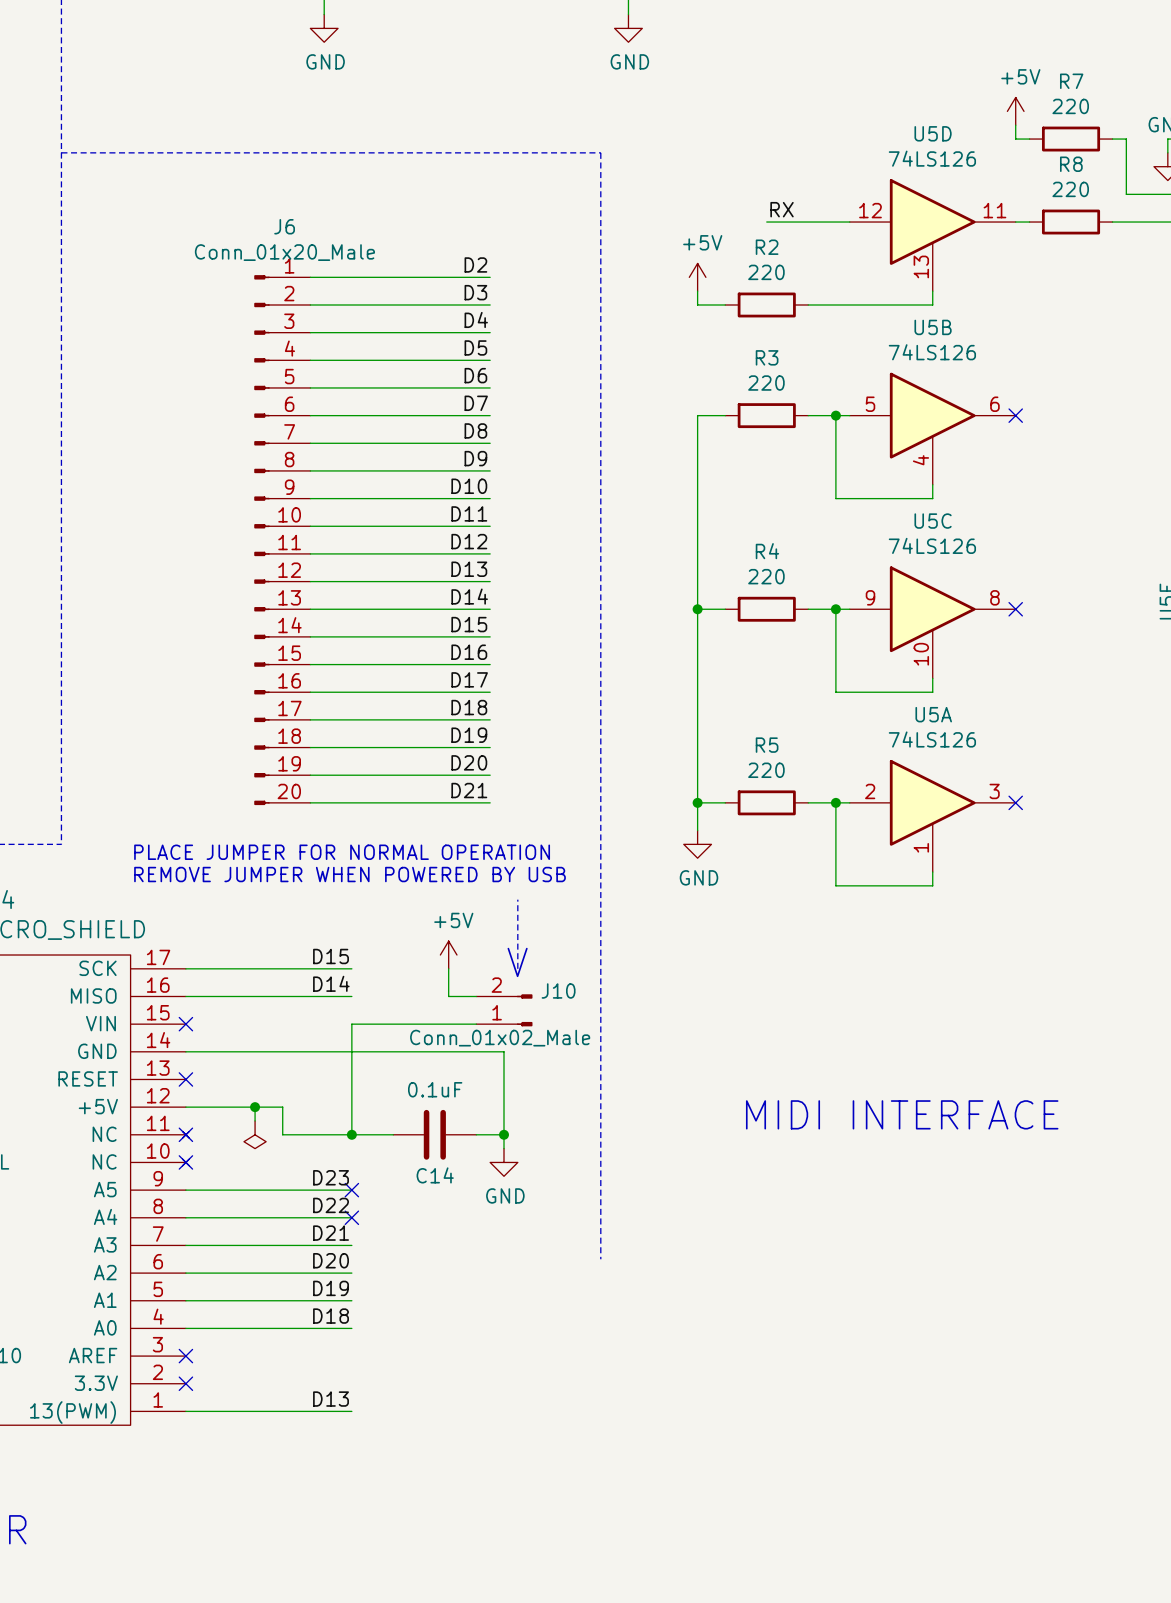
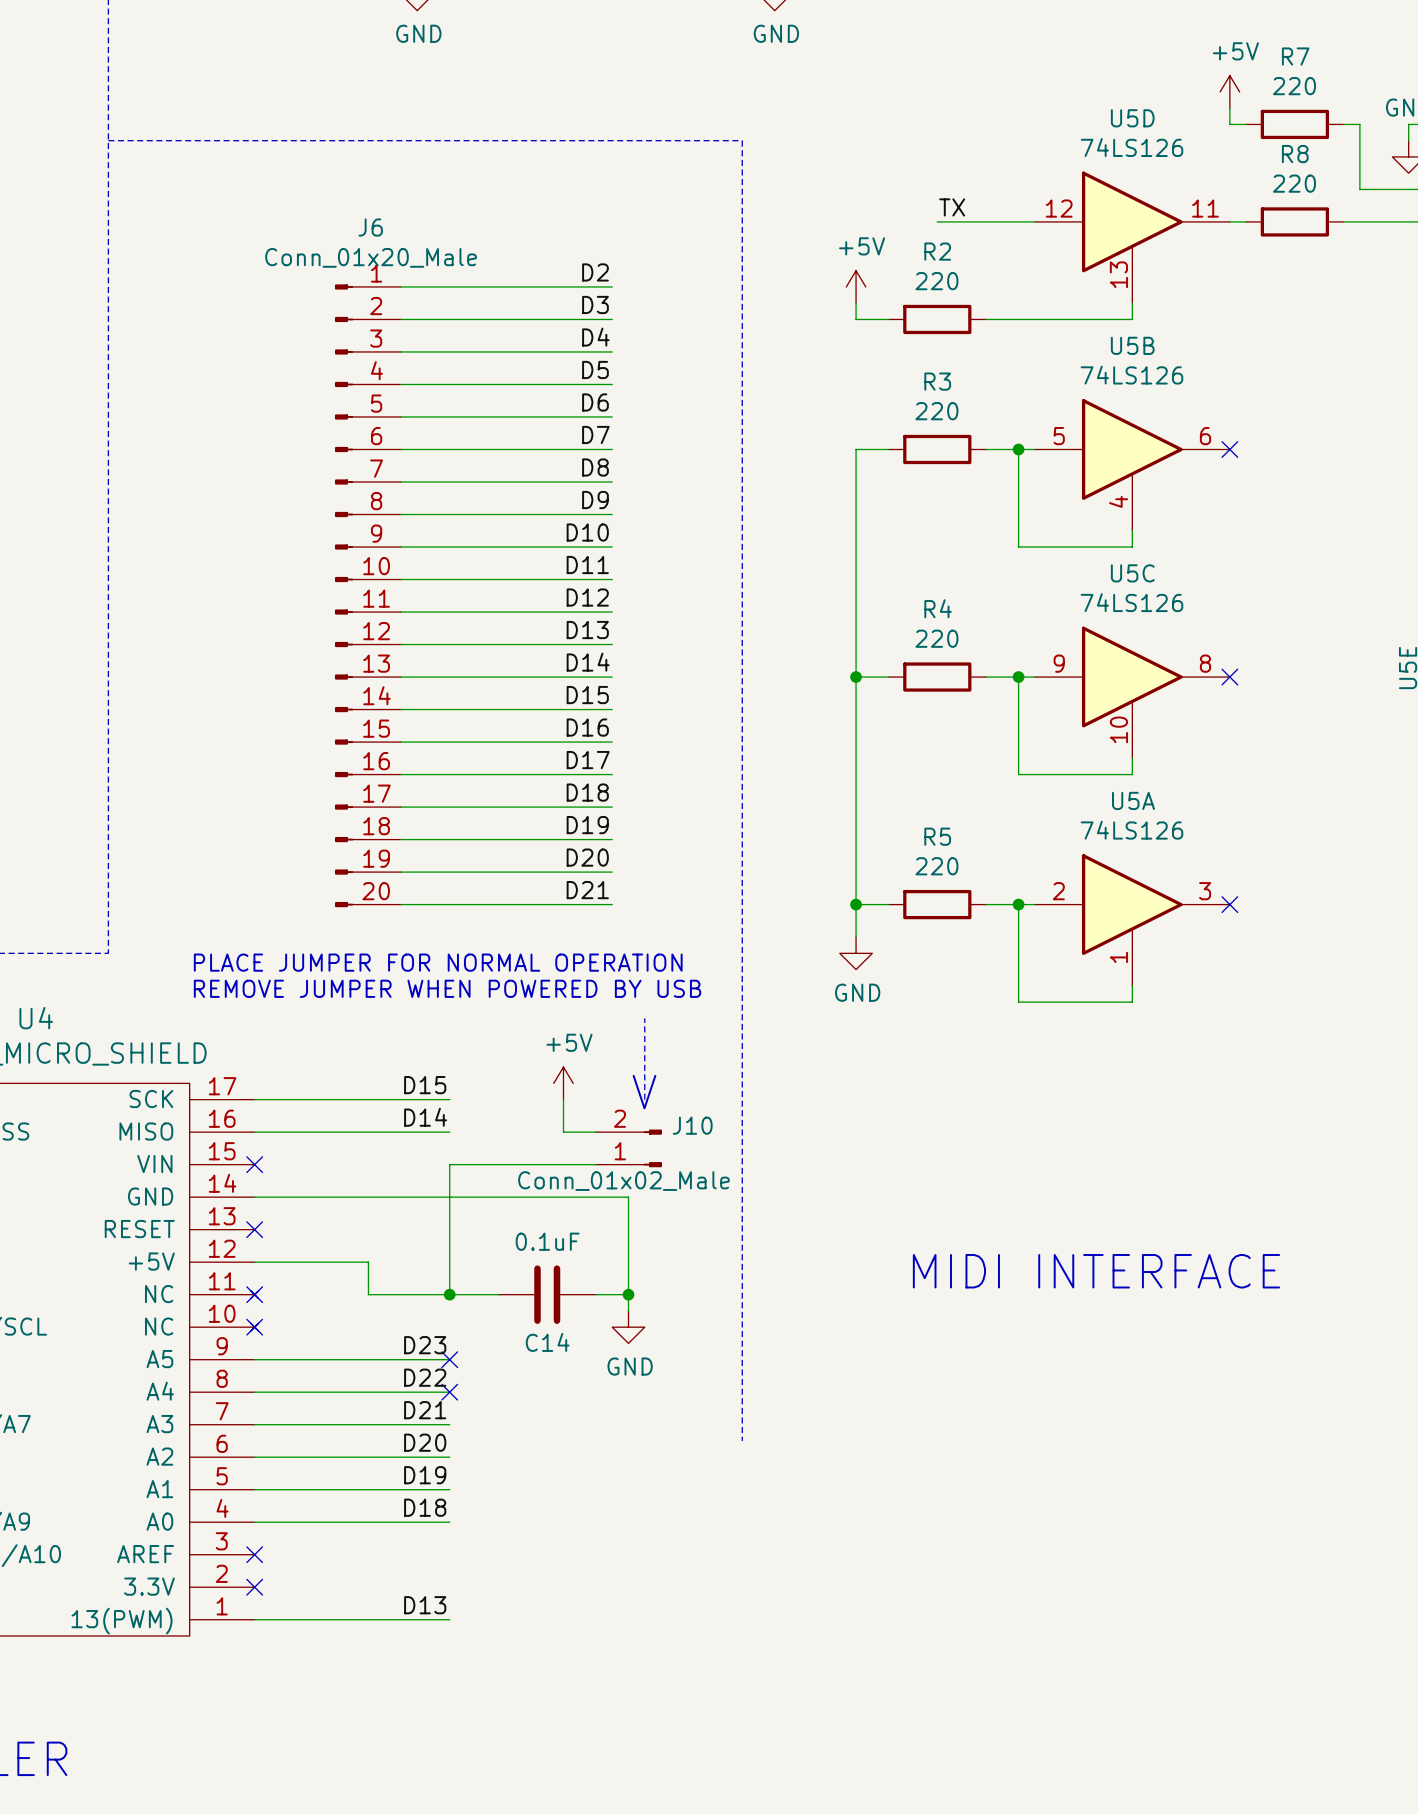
label: RX (782, 209) -> TX (952, 207)
wire: (255, 1107) (255, 1120) -> none
junction: (255, 1107) -> none
power symbol: (255, 1134) -> none

